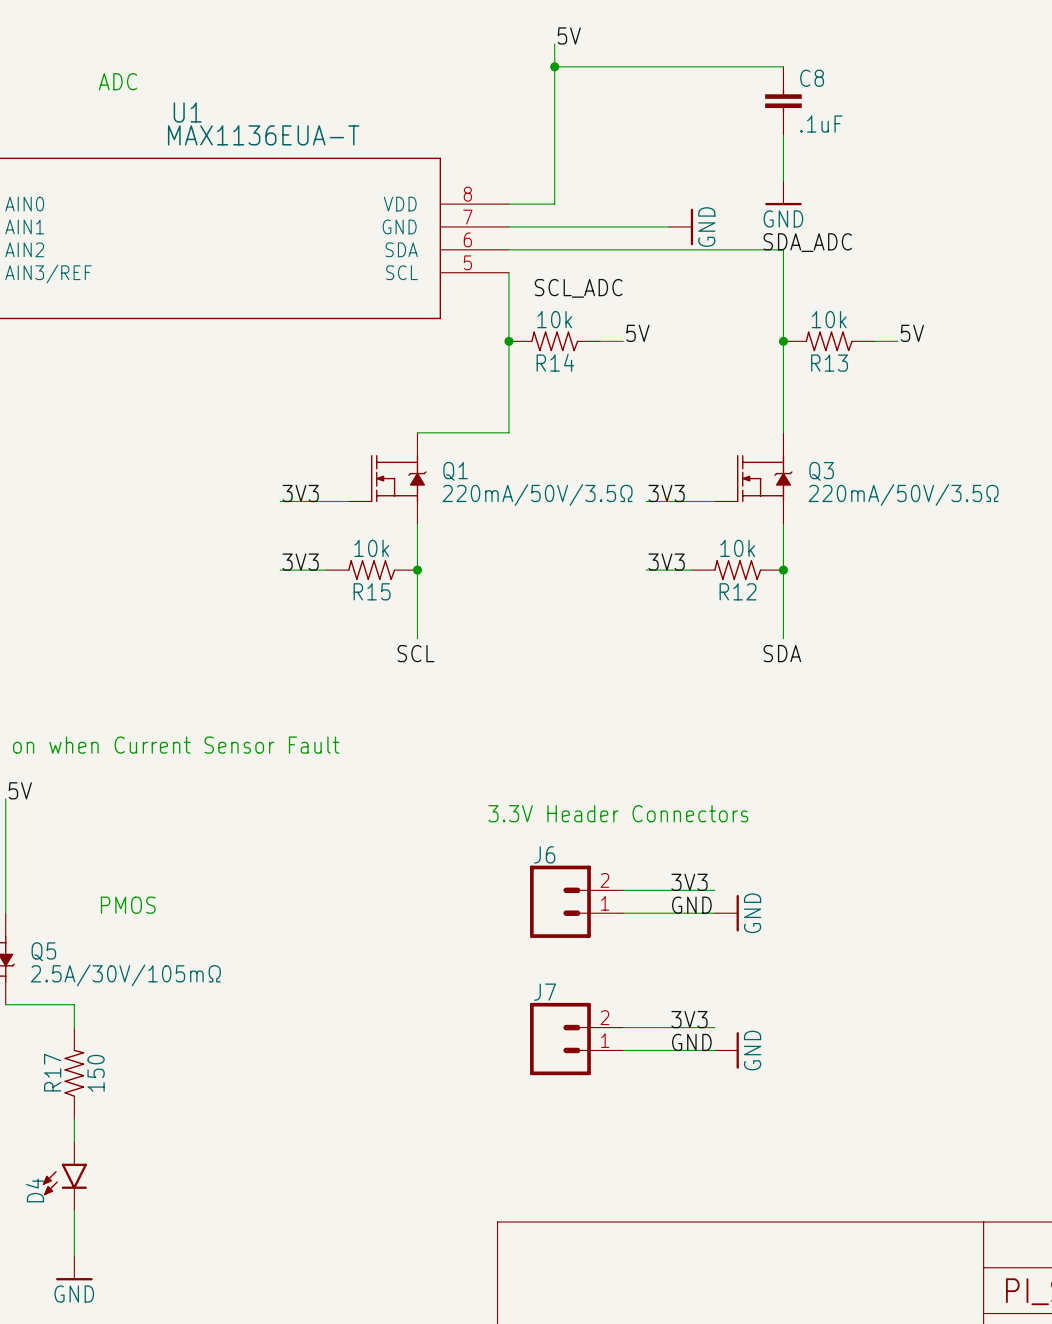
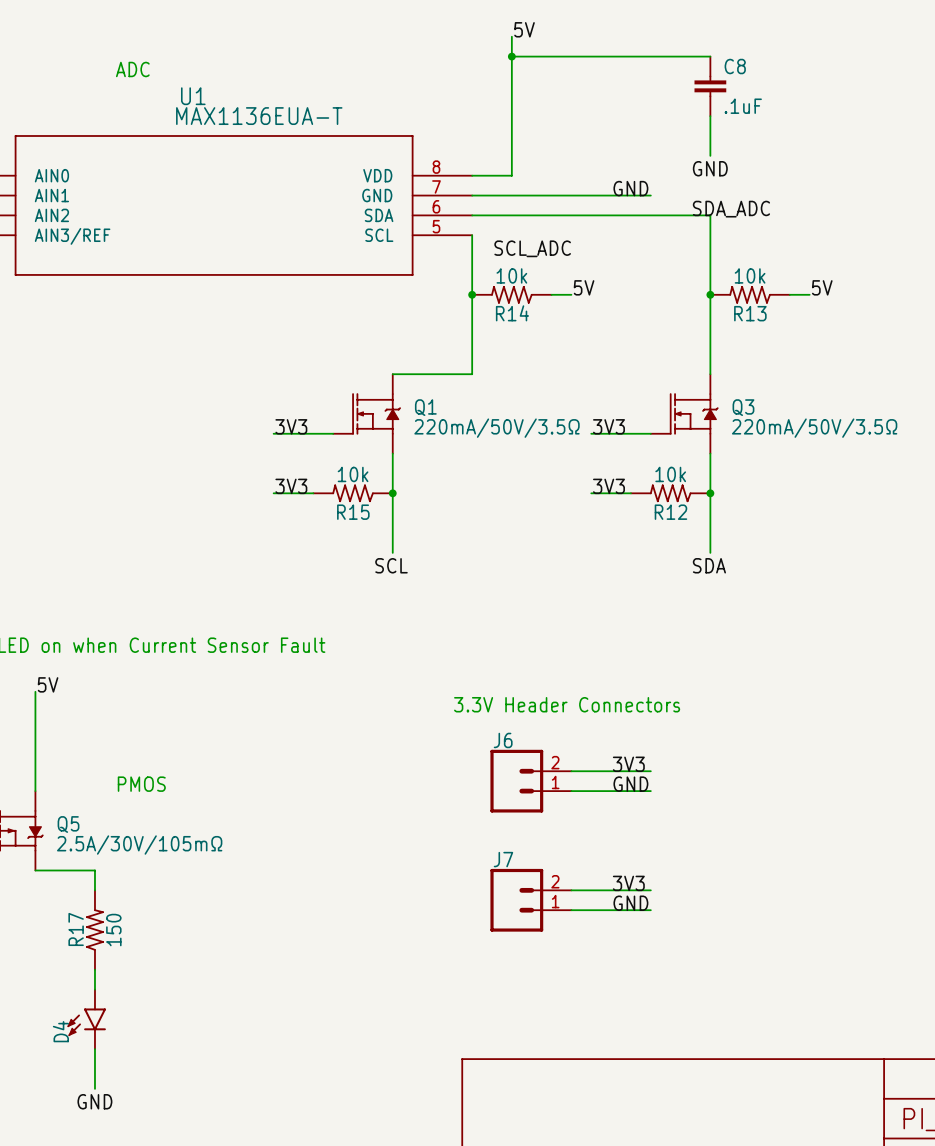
power symbol: GND (783, 193) -> none
label: none -> GND (710, 168)
label: none -> GND (630, 188)
power symbol: GND (681, 226) -> none
power symbol: GND (726, 913) -> none
power symbol: GND (726, 1050) -> none
power symbol: GND (74, 1268) -> none
label: none -> GND (94, 1101)

